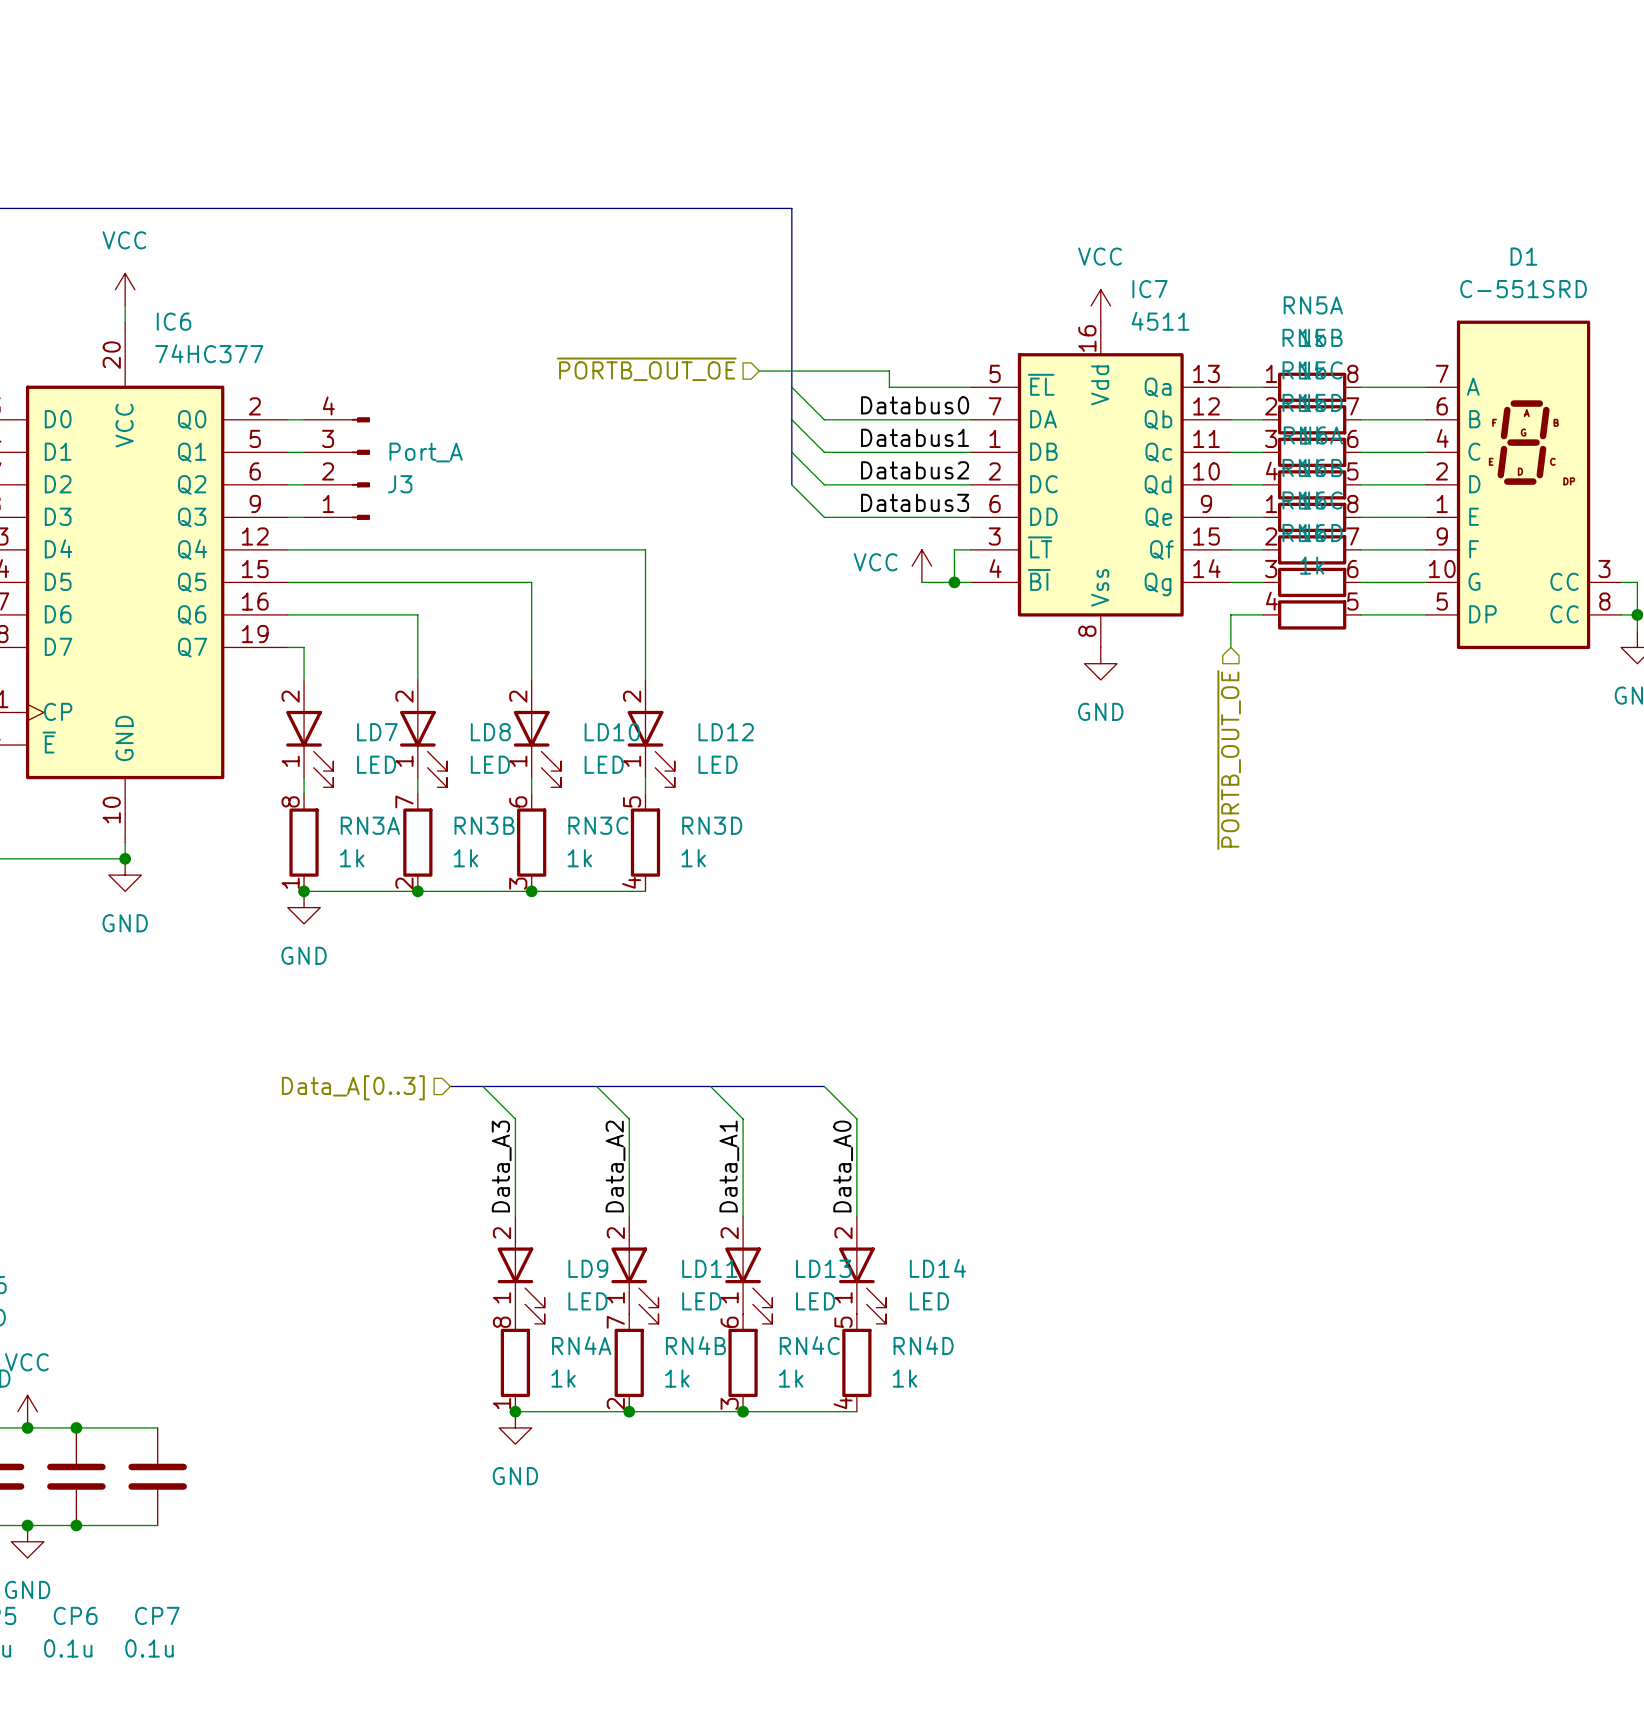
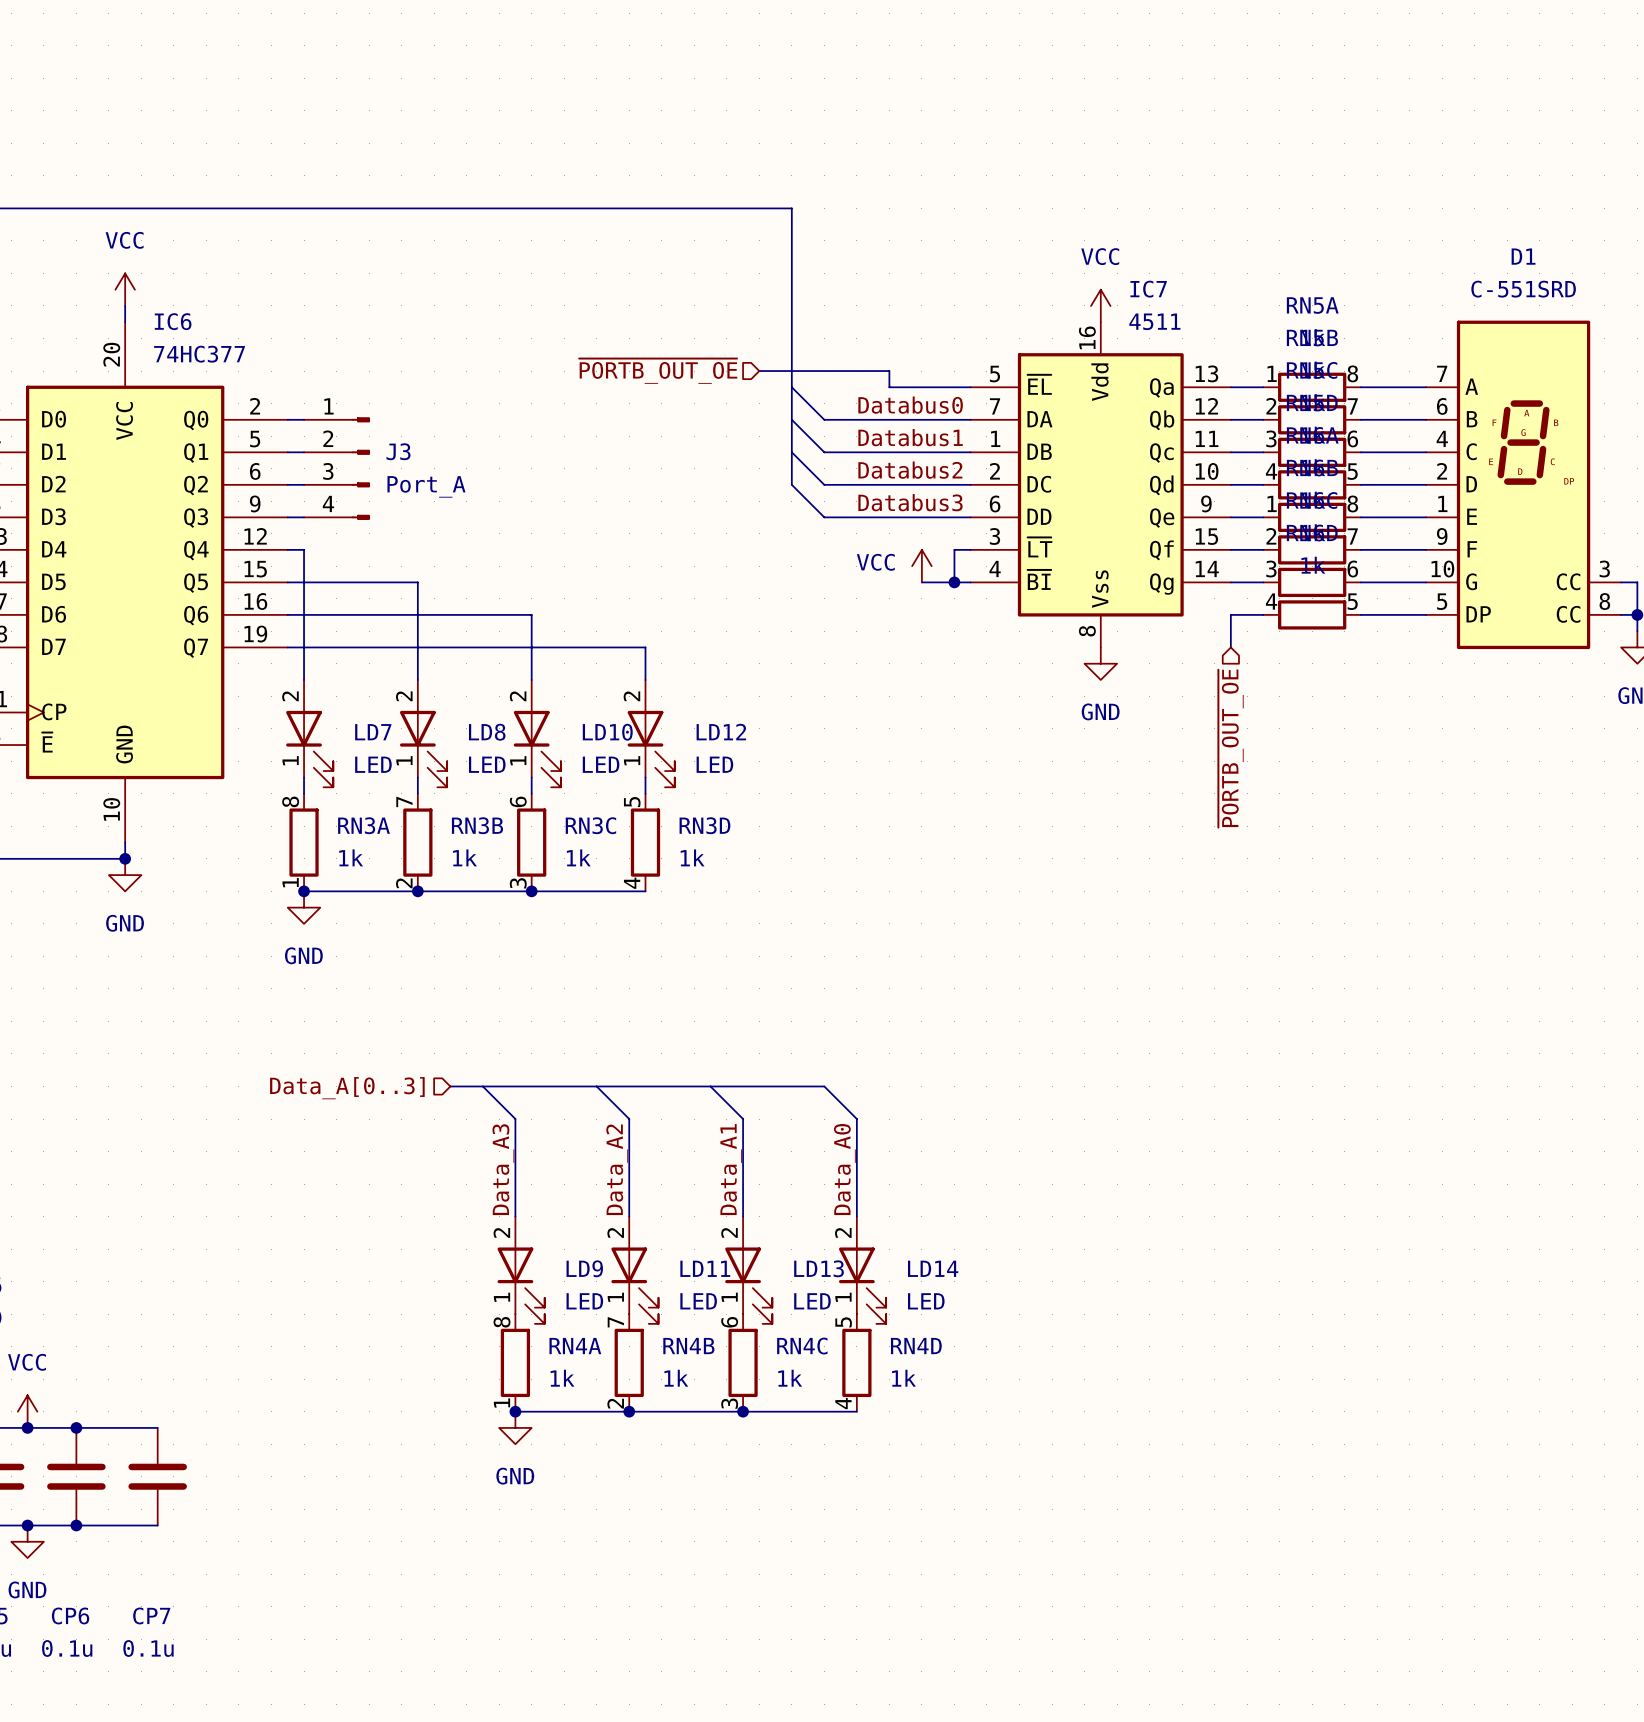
J3 flip: as is (360, 468) -> up-down (360, 468)
wire: (304, 549) (645, 549) (645, 647) -> (304, 549) (304, 647) (645, 647)
wire: (417, 582) (531, 582) (531, 614) -> (417, 582) (417, 614) (531, 614)

